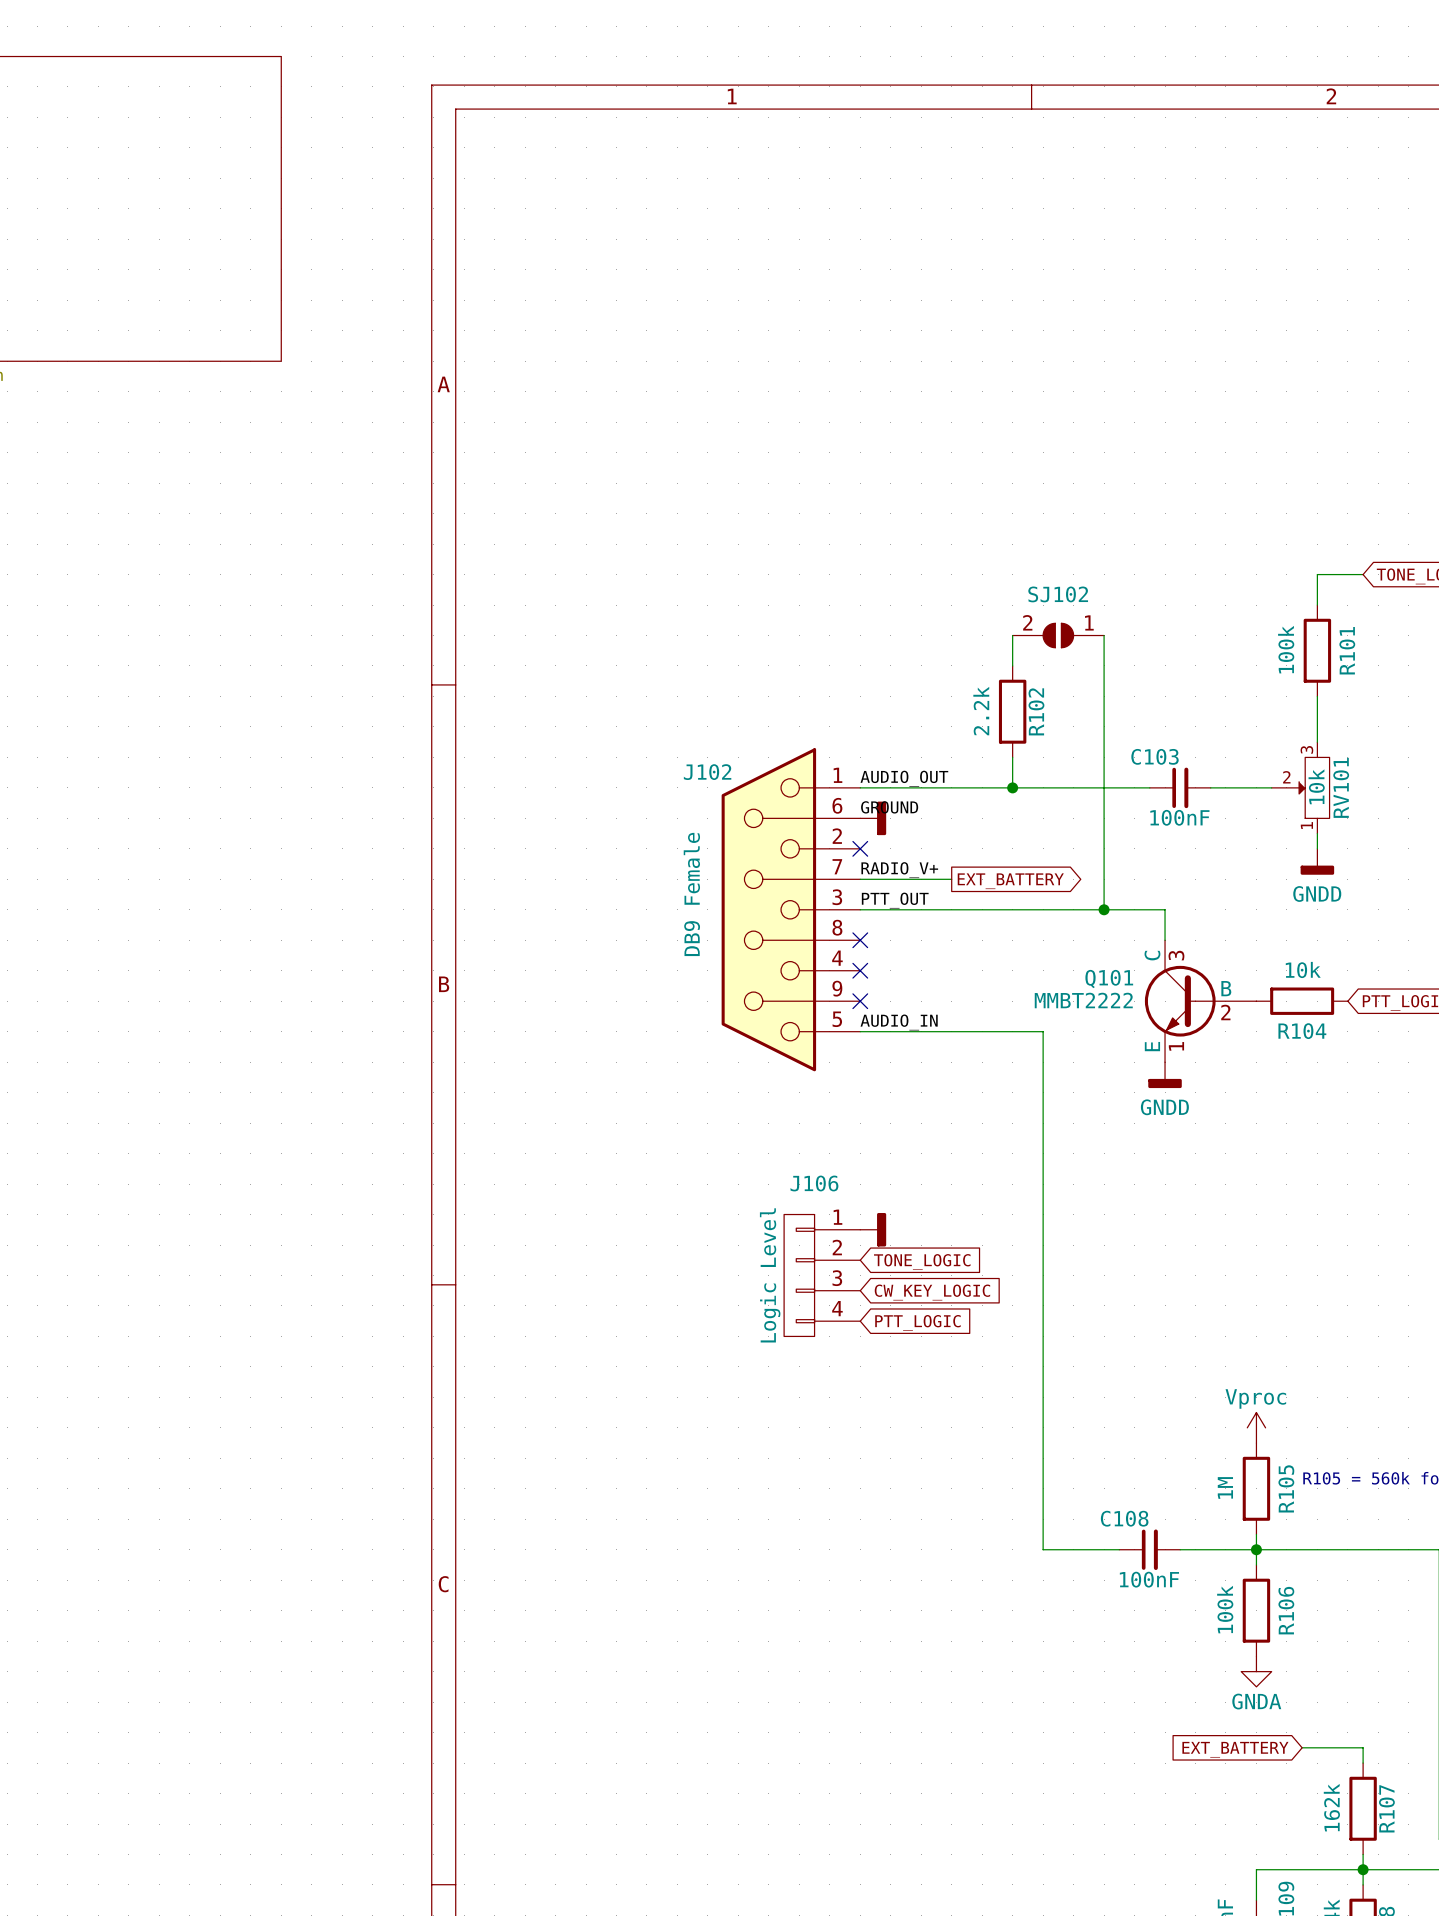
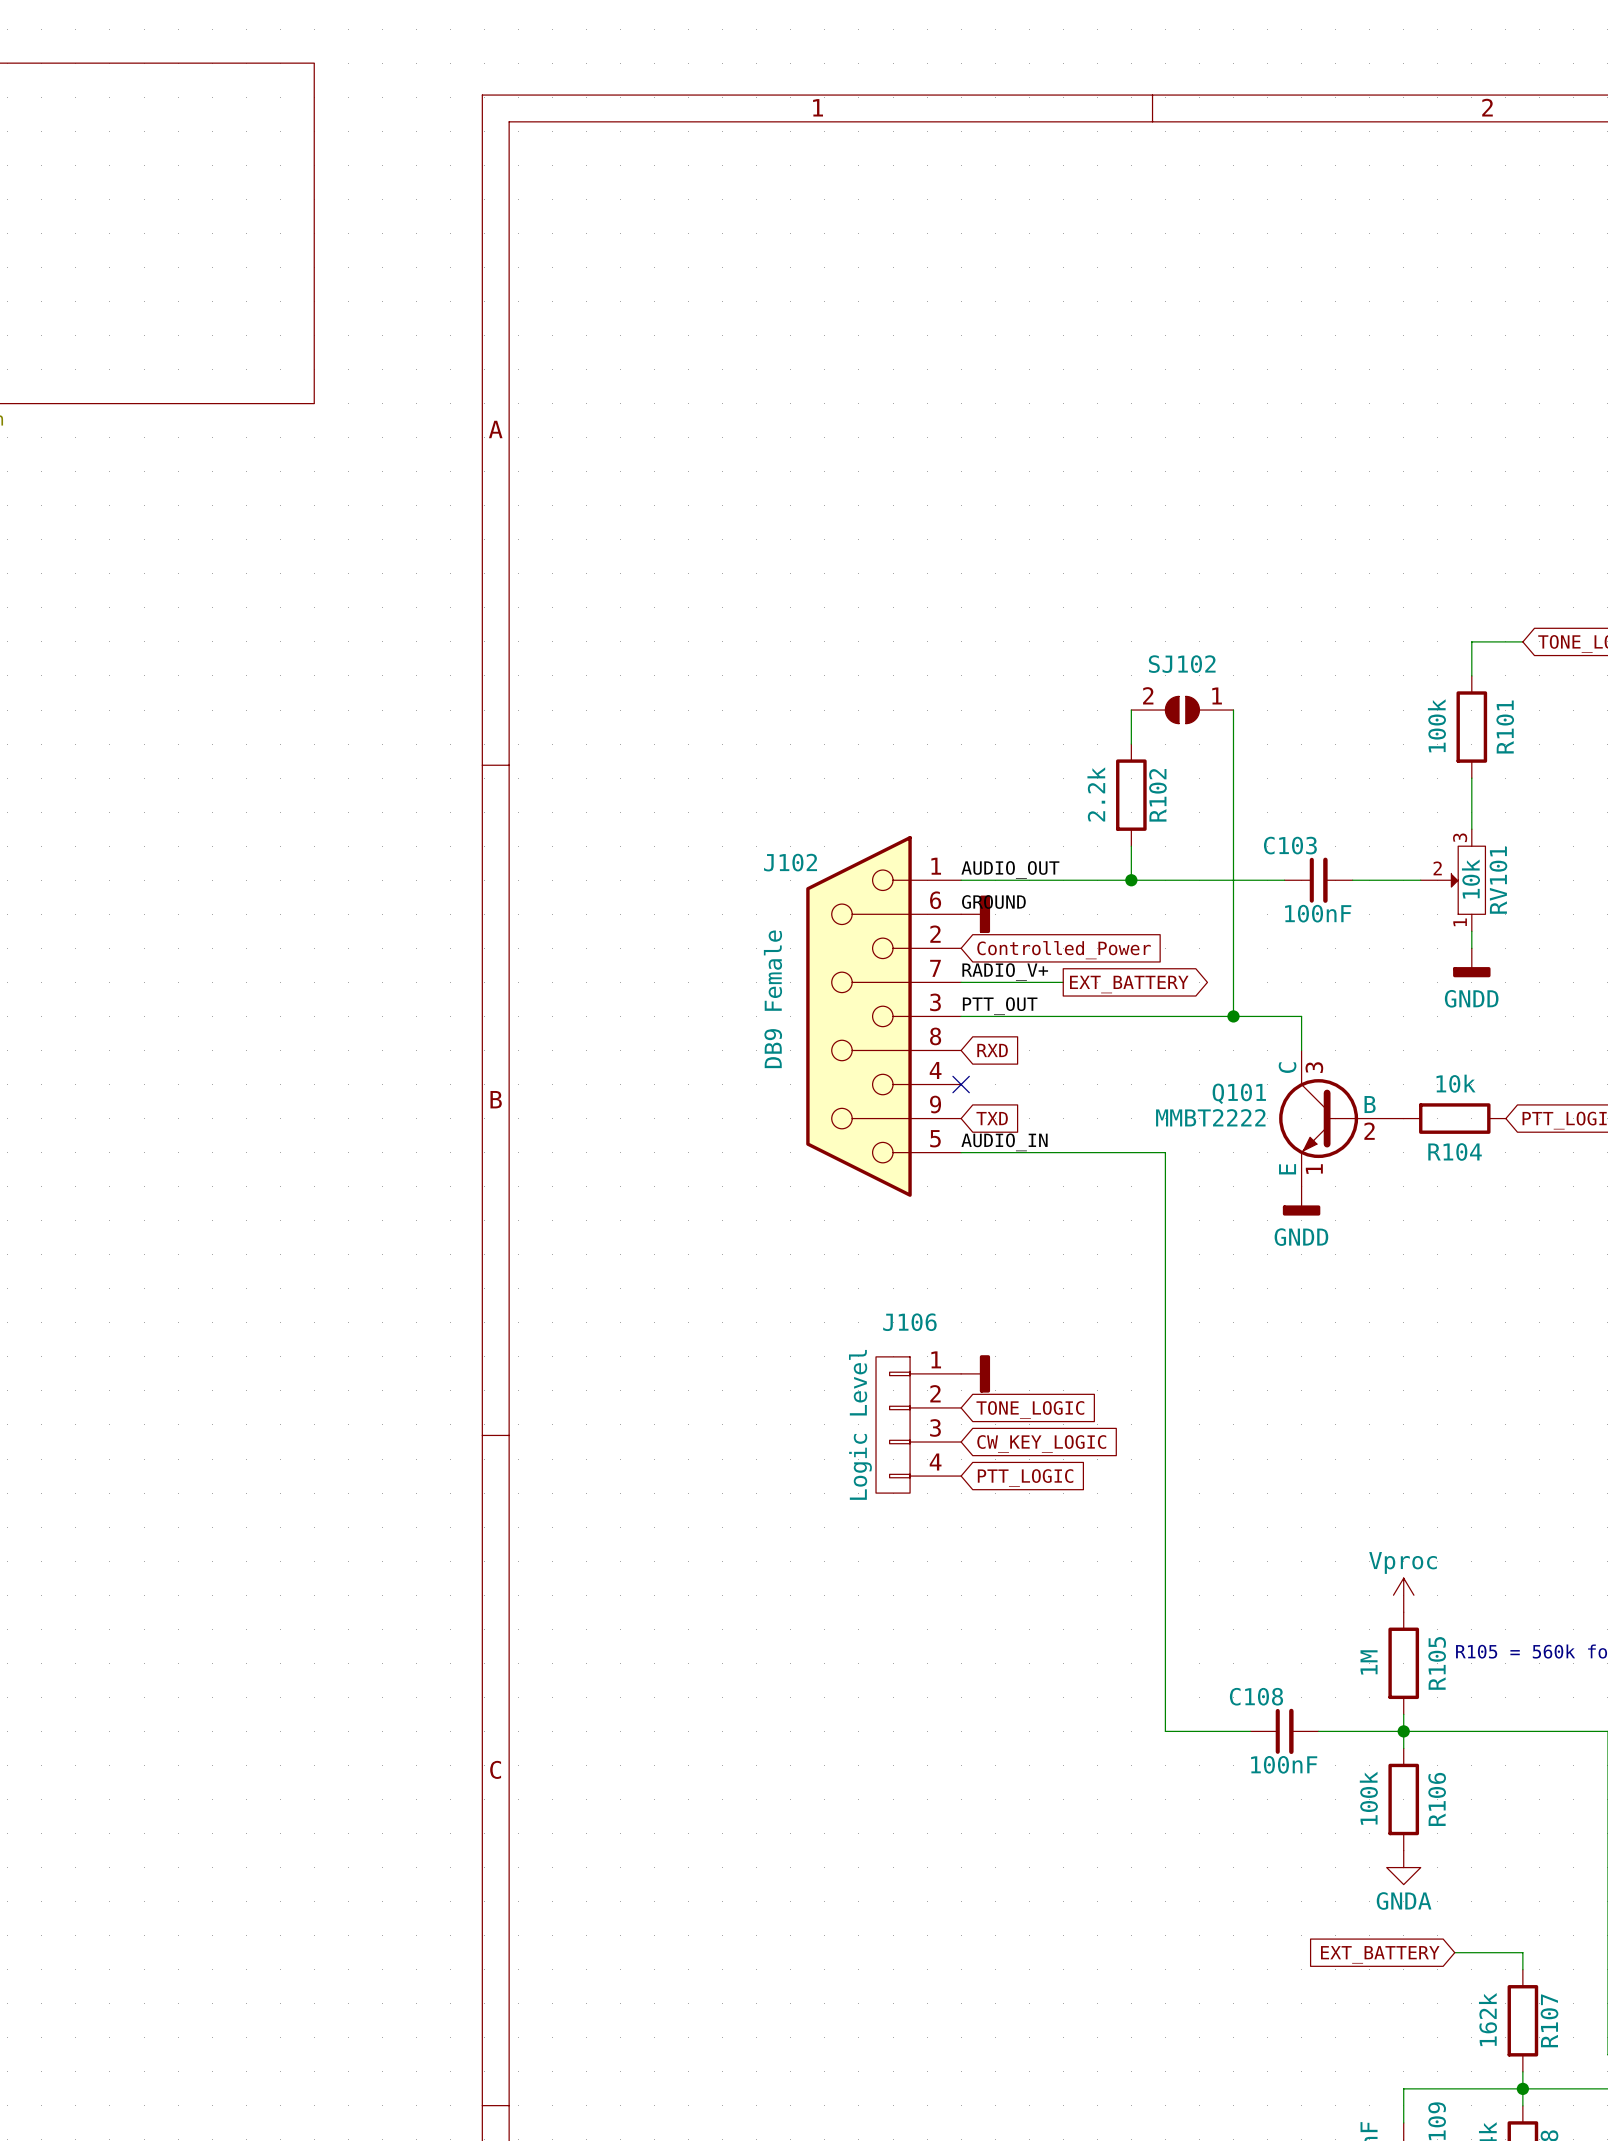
no-connect mark: (860, 848) -> none
global label: none -> Controlled_Power (1064, 950)
no-connect mark: (860, 940) -> none
global label: none -> RXD (992, 1050)
no-connect mark: (860, 1001) -> none
global label: none -> TXD (992, 1118)

